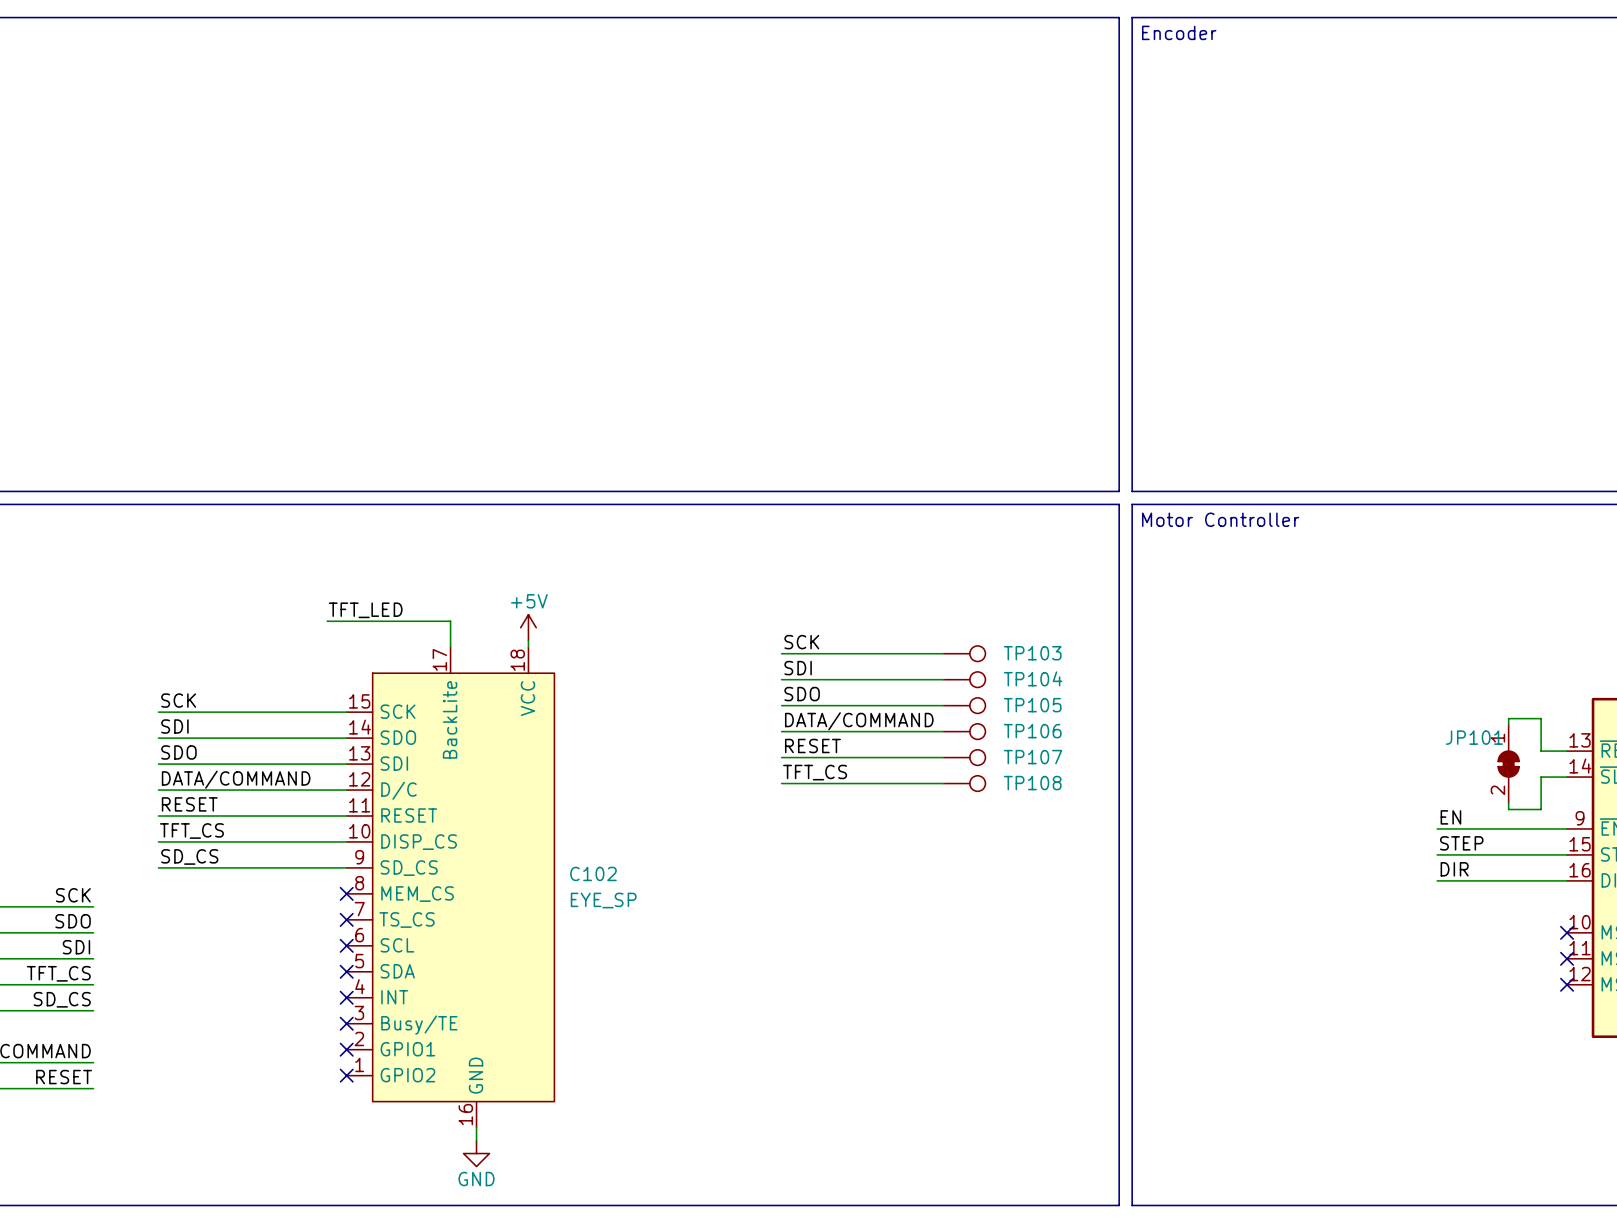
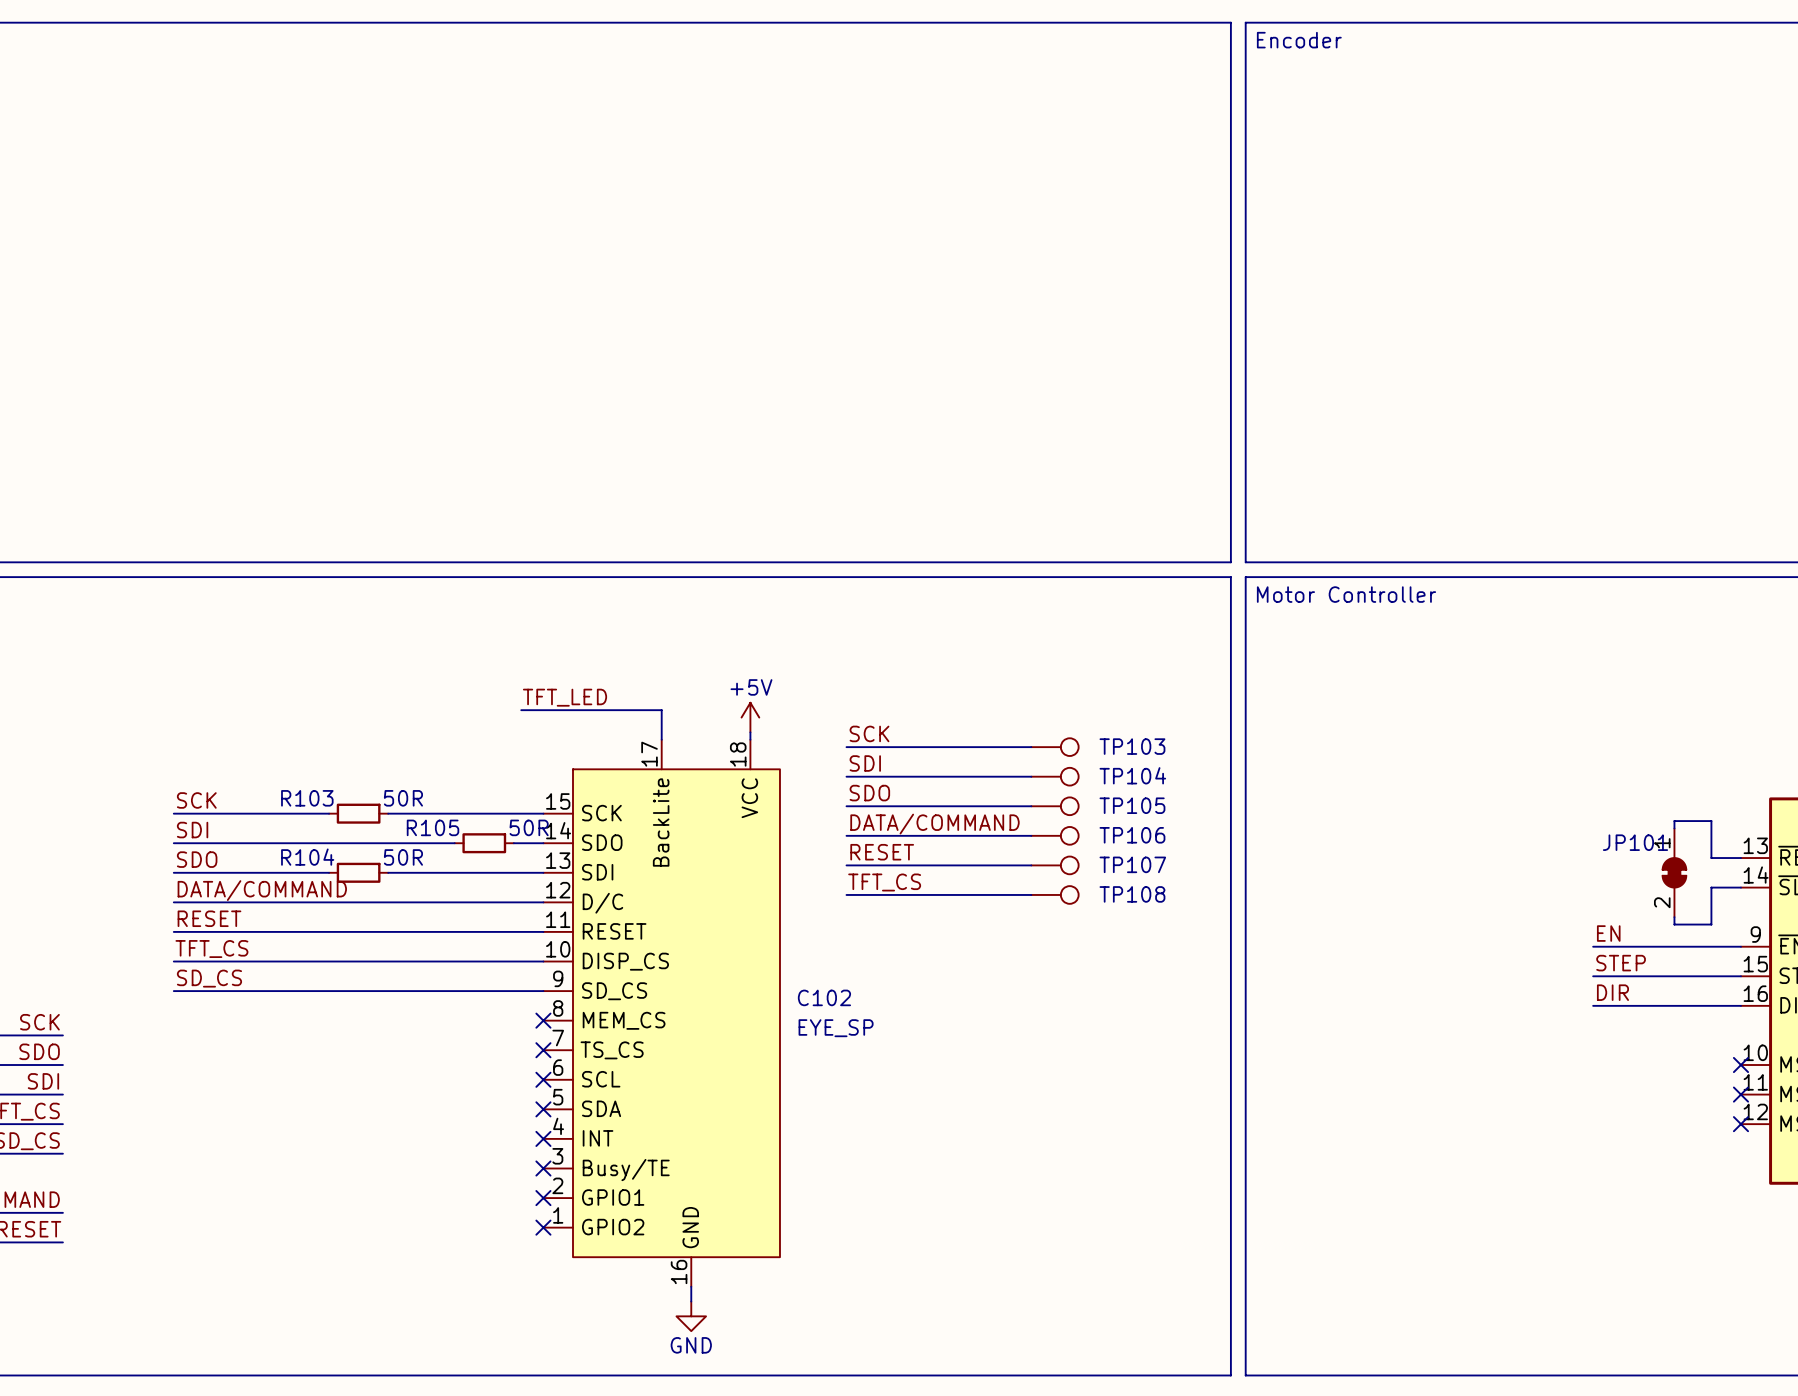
label position: TFT_LED (365, 610) -> TFT_LED (565, 697)
wire: (327, 621) (450, 621) (450, 647) -> (521, 710) (661, 710) (661, 739)
power symbol position: +5V (528, 627) -> +5V (750, 717)
wire: (528, 640) (528, 647) -> (750, 732) (750, 739)
label position: SCK (178, 700) -> SCK (196, 800)
wire: (158, 712) (190, 712) -> none
wire: (327, 712) (346, 712) -> none
R103: none -> 50R (358, 813)
label position: SDI (174, 726) -> SDI (192, 830)
wire: (158, 738) (190, 738) -> none
R105: none -> 50R (484, 843)
label position: SDO (178, 752) -> SDO (197, 859)
wire: (158, 764) (190, 764) -> none
wire: (327, 764) (346, 764) -> none
R104: none -> 50R (358, 872)
label position: DATA/COMMAND (236, 779) -> DATA/COMMAND (262, 890)
wire: (158, 790) (190, 790) -> none
label position: RESET (189, 804) -> RESET (209, 918)
wire: (158, 816) (190, 816) -> none
label position: TFT_CS (191, 831) -> TFT_CS (211, 949)
wire: (158, 841) (190, 841) -> none
label position: SD_CS (189, 856) -> SD_CS (209, 978)
wire: (158, 867) (190, 867) -> none
C102 position: (450, 887) -> (661, 1013)
no-connect mark: (346, 893) -> none
no-connect mark: none -> (543, 1020)
no-connect mark: (346, 919) -> none
no-connect mark: none -> (543, 1050)
no-connect mark: (346, 945) -> none
no-connect mark: none -> (543, 1079)
no-connect mark: (346, 971) -> none
no-connect mark: none -> (543, 1109)
no-connect mark: (346, 997) -> none
no-connect mark: none -> (543, 1138)
no-connect mark: (346, 1023) -> none
no-connect mark: none -> (543, 1168)
no-connect mark: (346, 1049) -> none
no-connect mark: none -> (543, 1198)
no-connect mark: (346, 1075) -> none
no-connect mark: none -> (543, 1227)
wire: (476, 1127) (476, 1140) -> (691, 1286) (691, 1301)
power symbol position: GND (476, 1153) -> GND (691, 1316)

